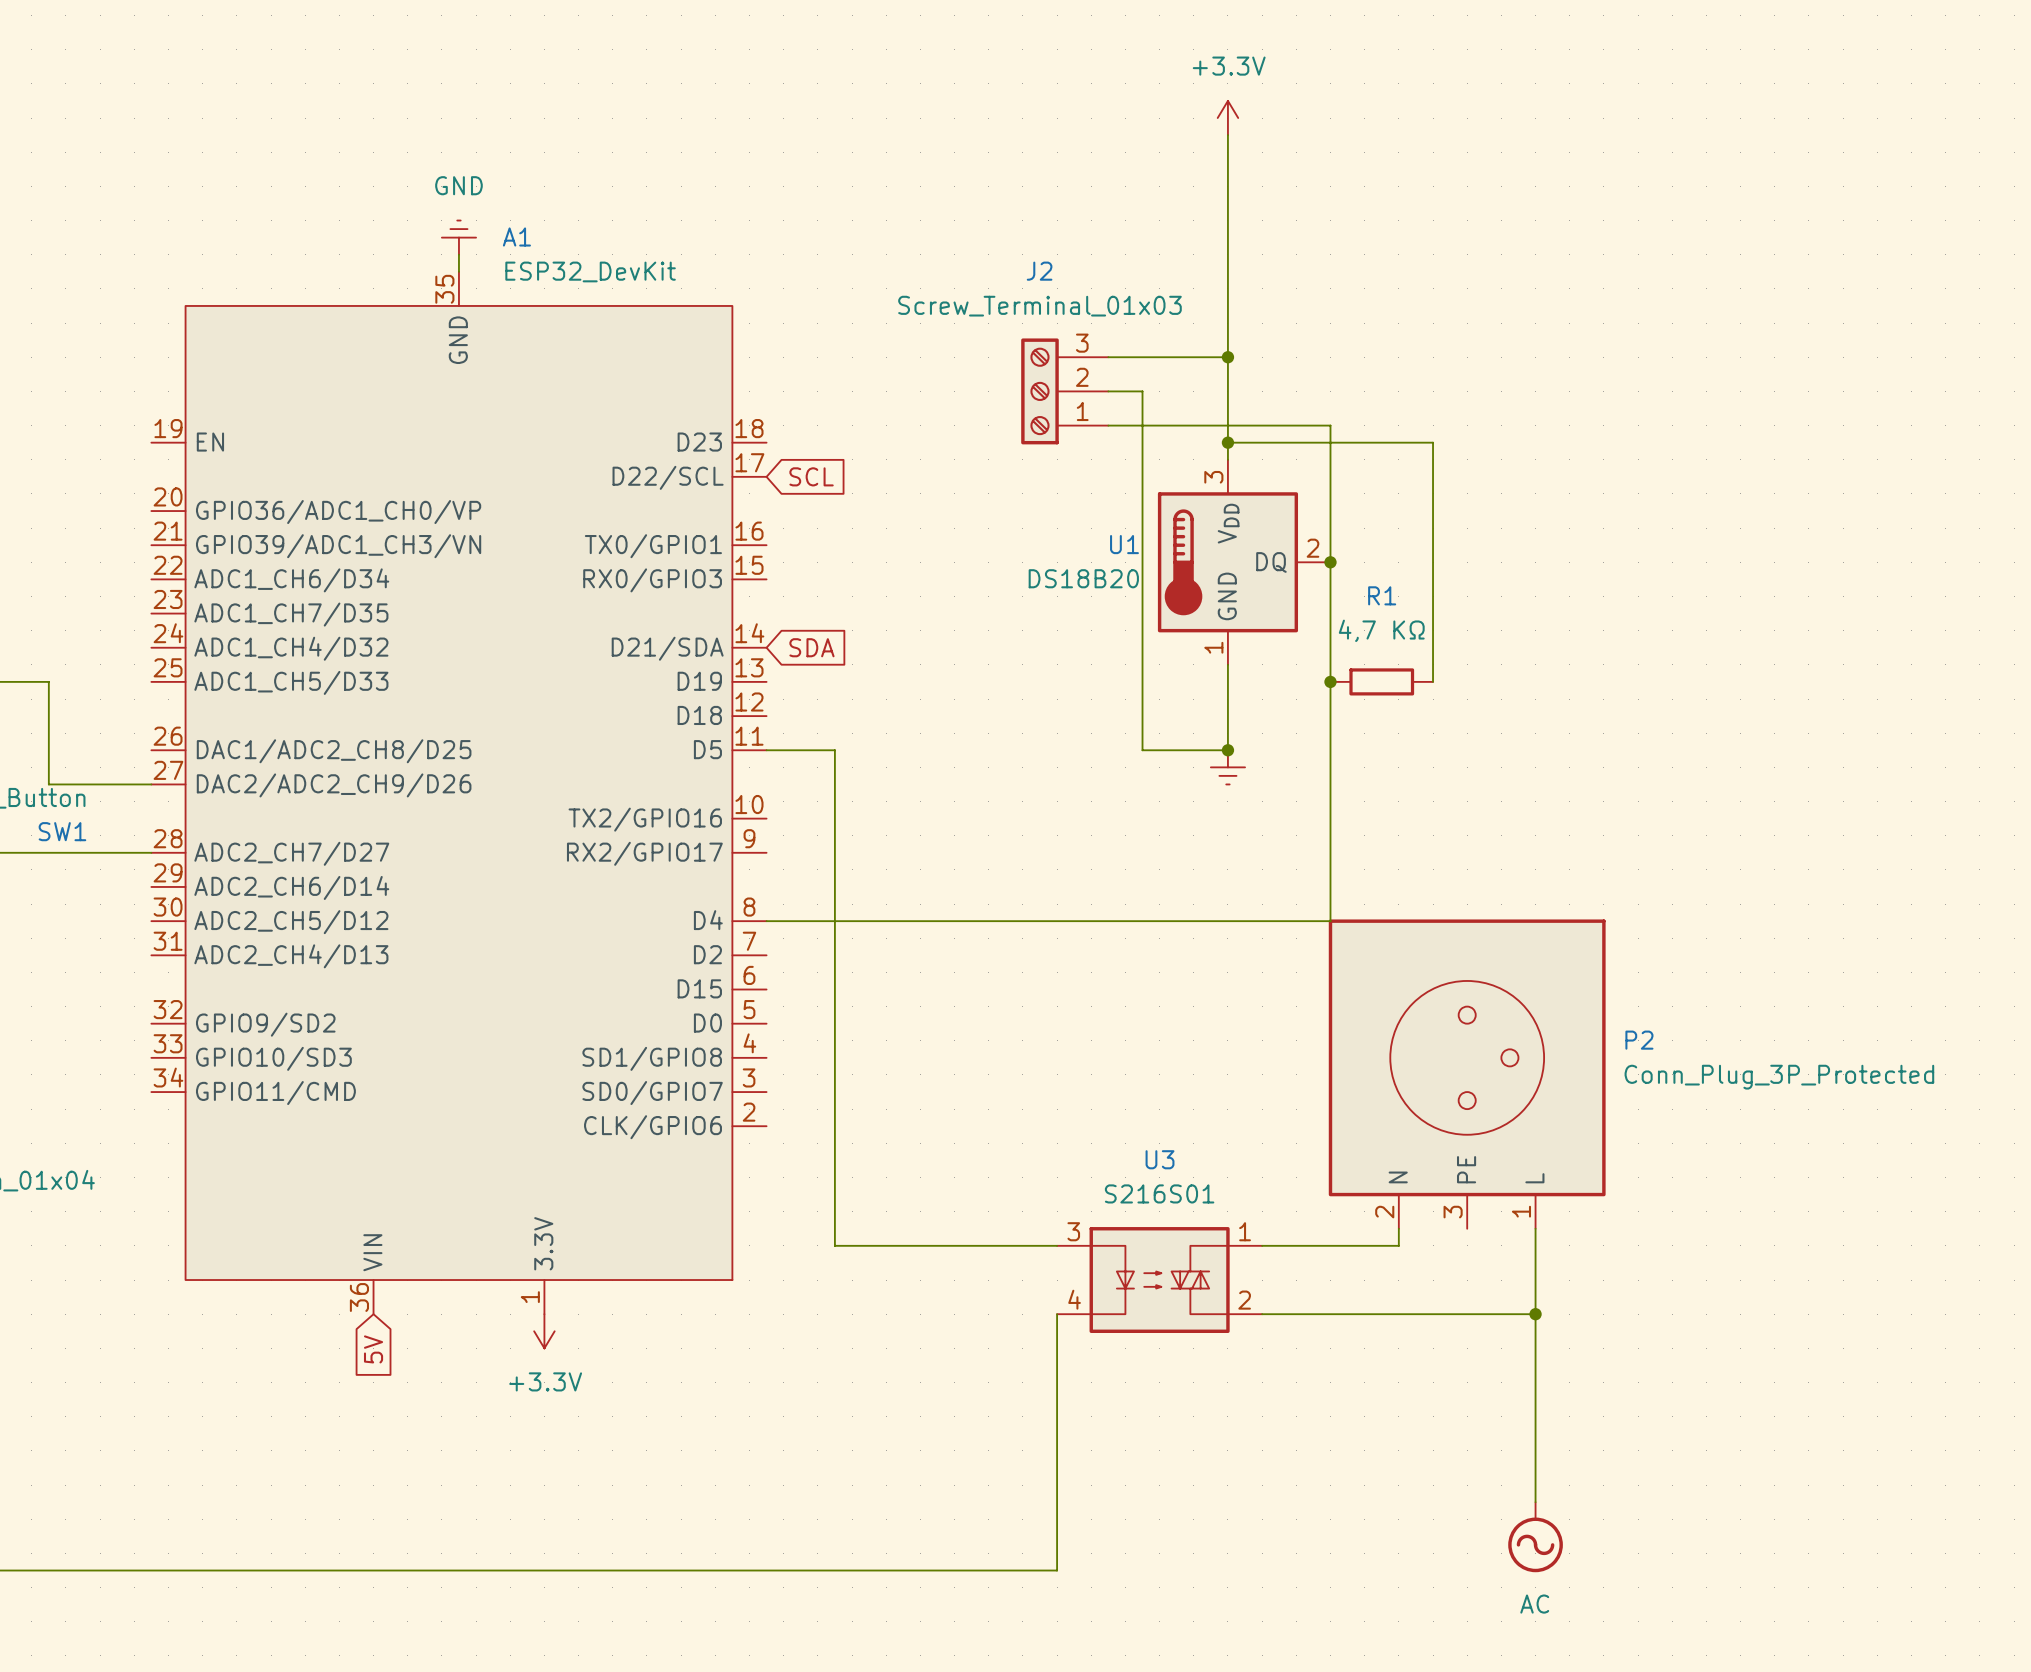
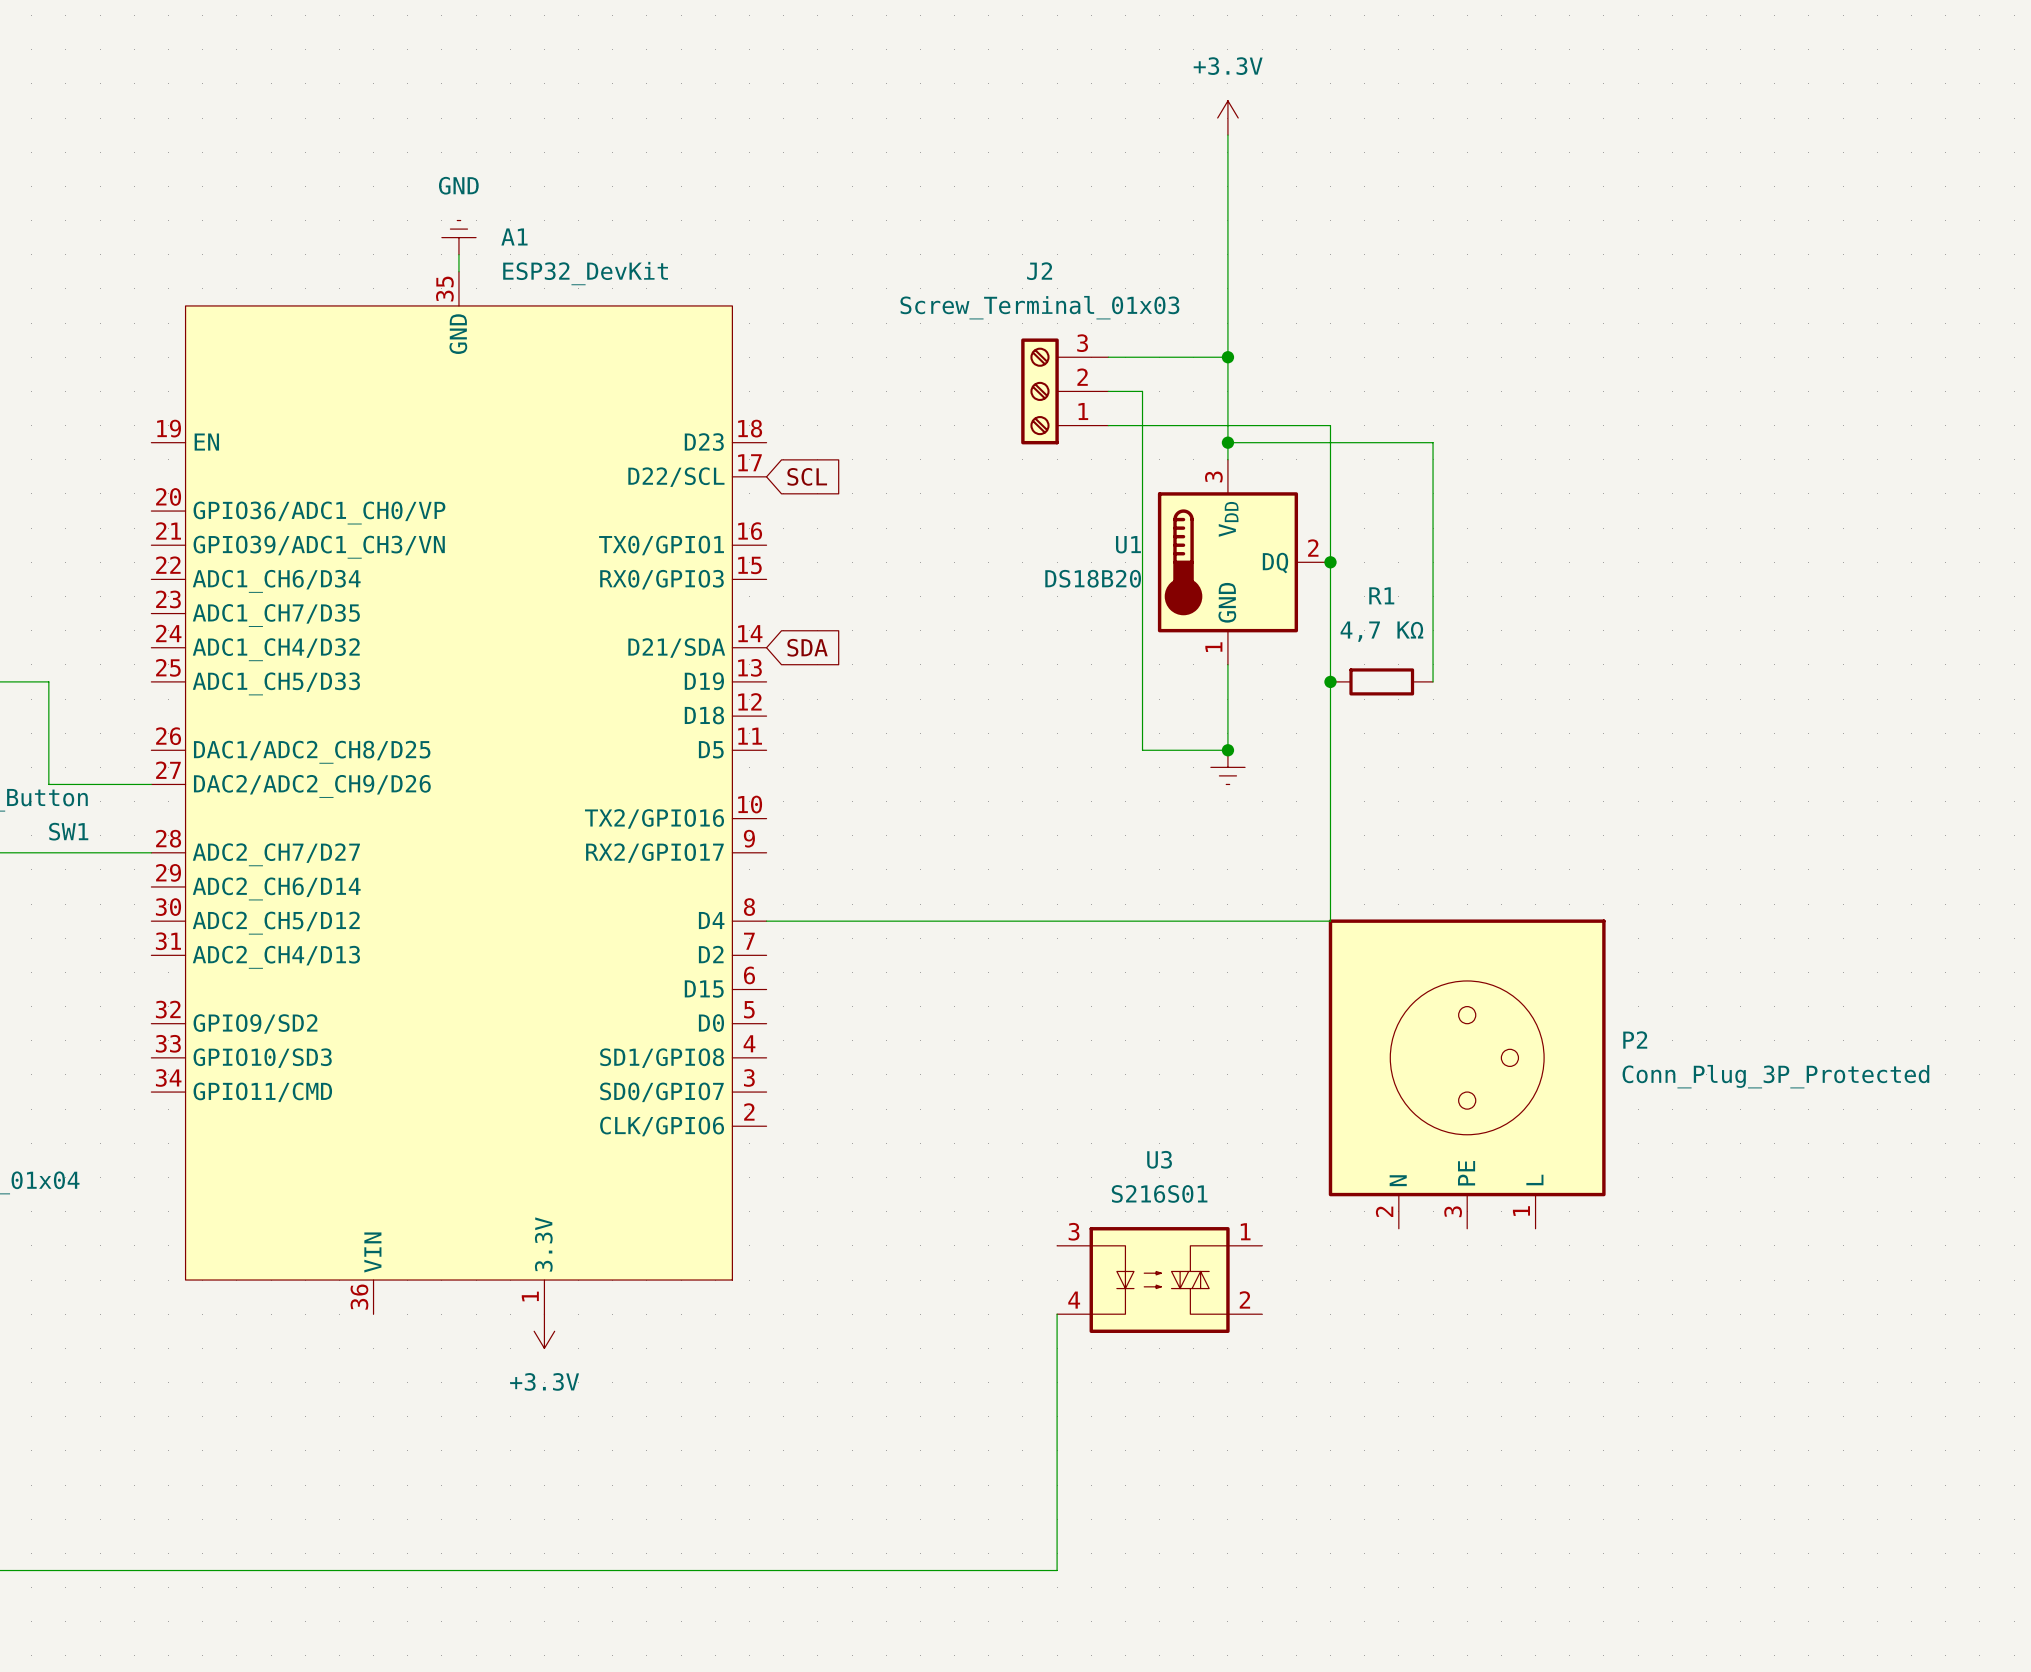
wire: (766, 750) (834, 750) (834, 1245) (1057, 1245) -> none
wire: (1398, 1228) (1398, 1245) (1262, 1245) -> none
wire: (1535, 1228) (1535, 1502) -> none
wire: (1262, 1314) (1535, 1314) -> none
junction: (1535, 1314) -> none
global label: 5V (373, 1349) -> none
power symbol: AC (1535, 1537) -> none

